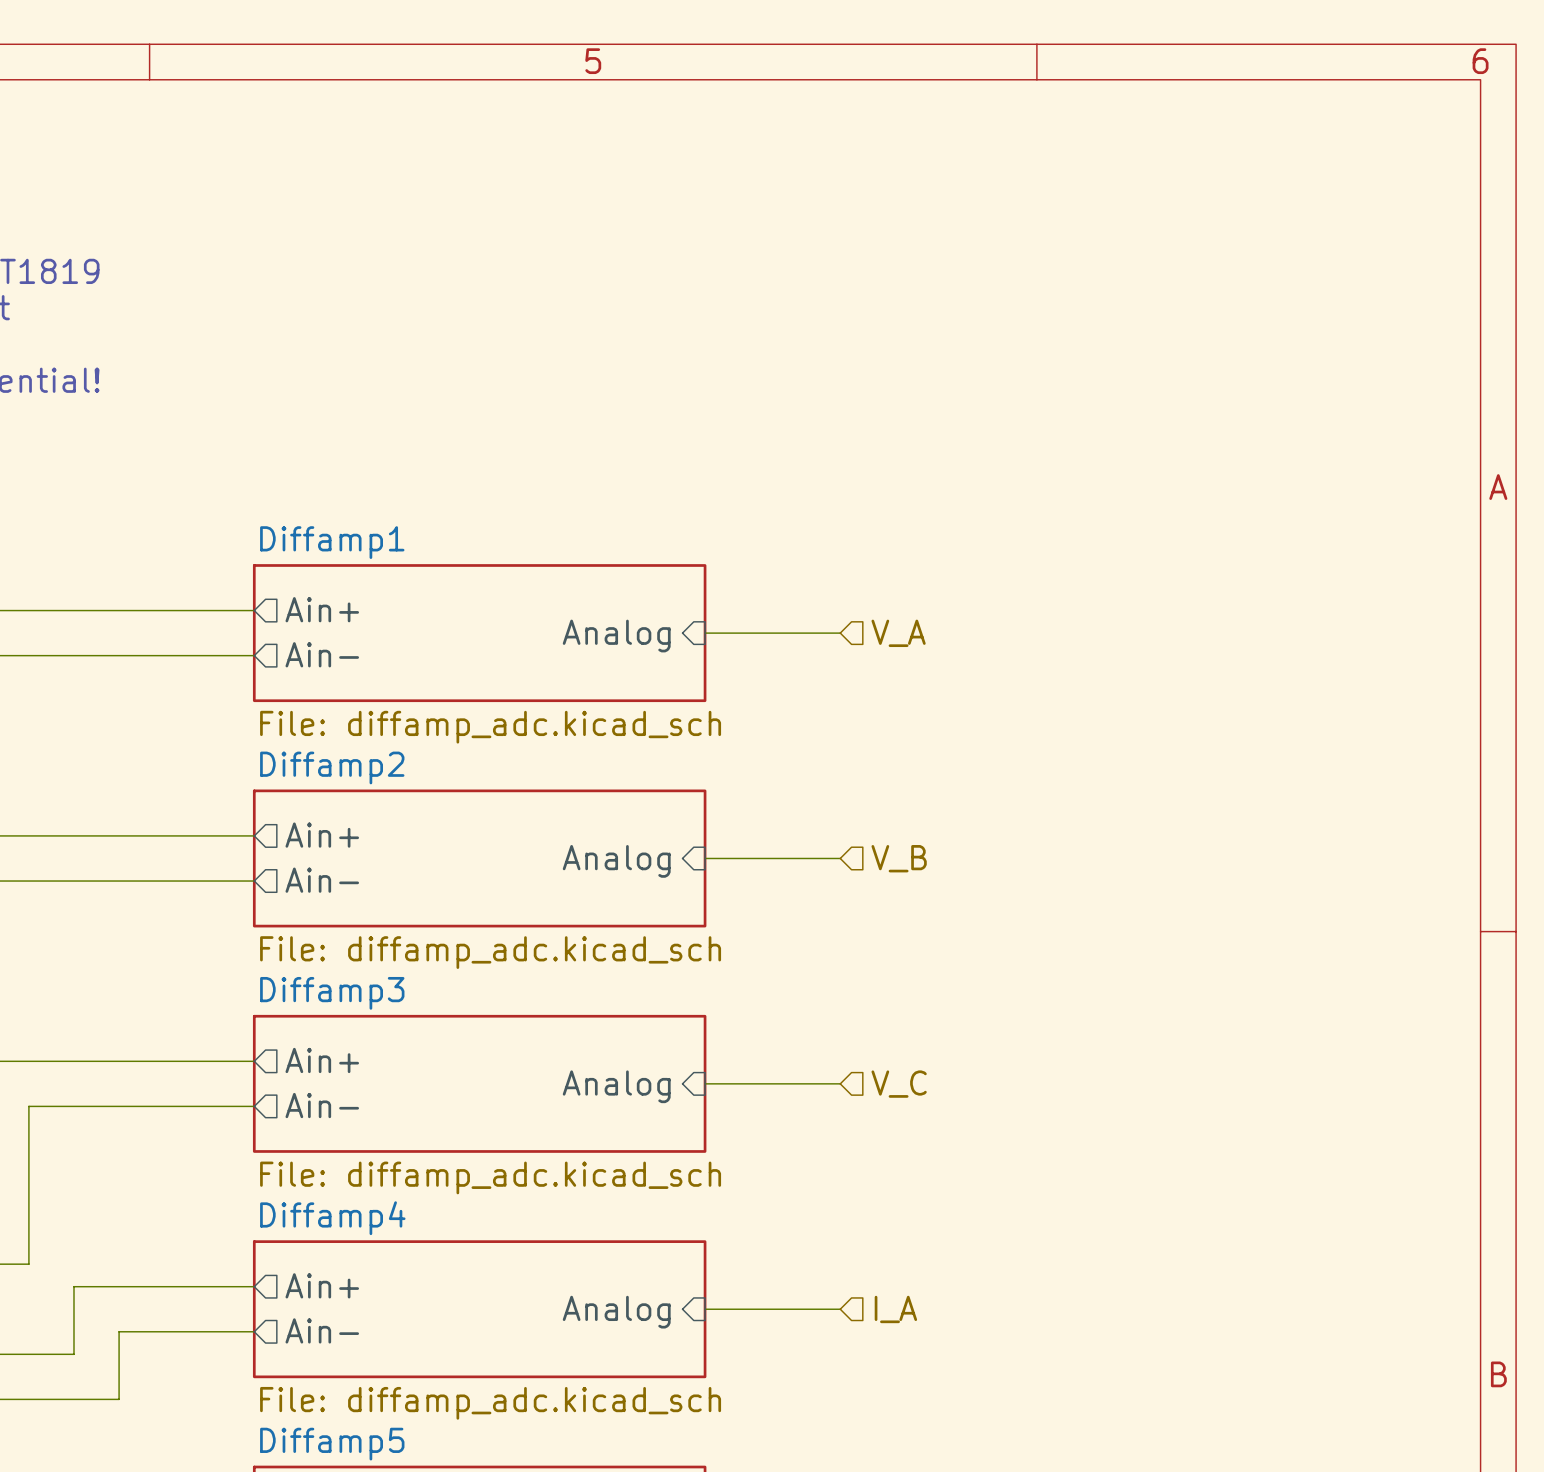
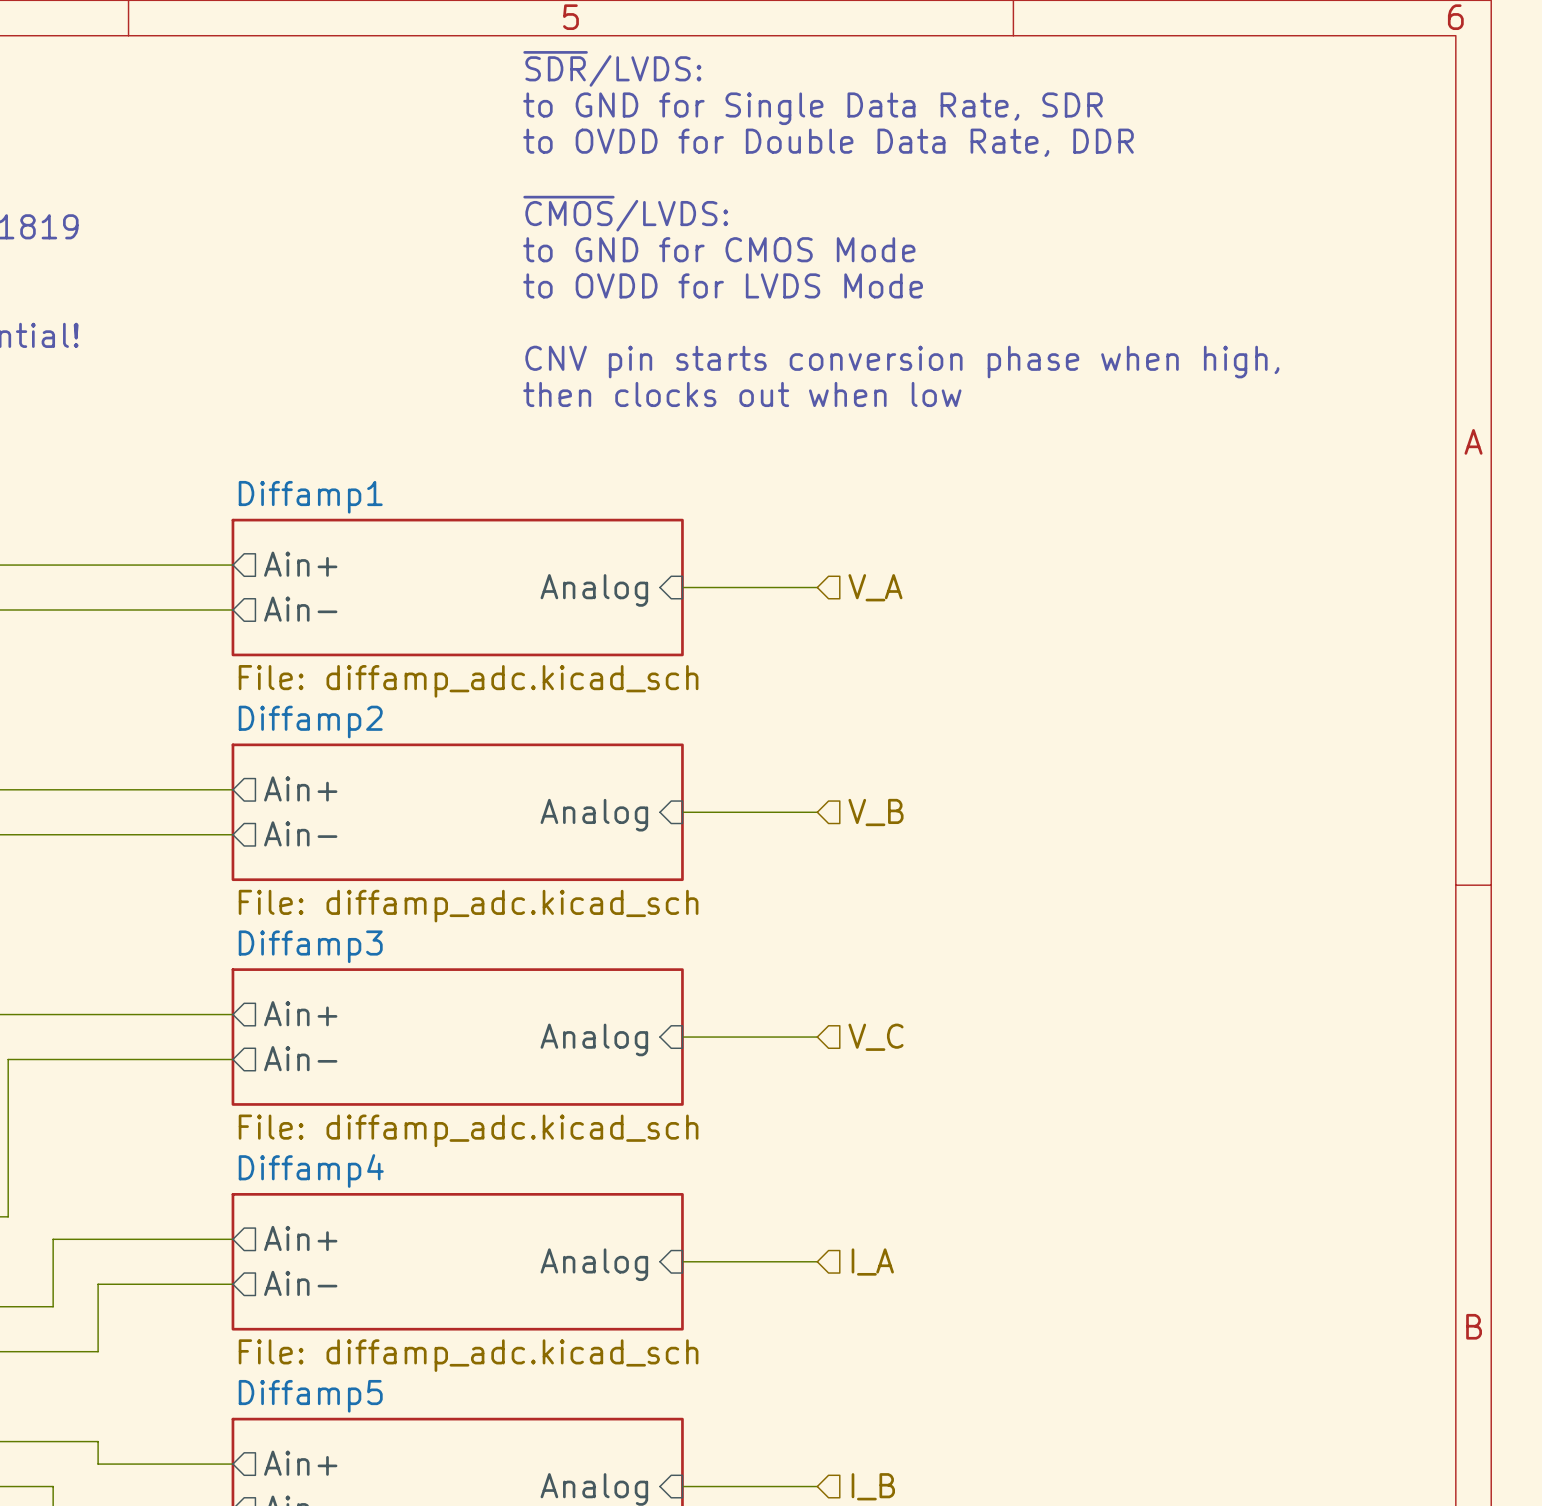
text: none -> ~{SDR}/LVDS: (612, 68)
text: none -> to GND for Single Data Rate, SDR (812, 108)
text: none -> to OVDD for Double Data Rate, DDR (828, 142)
text: none -> ~{CMOS}/LVDS: (625, 213)
text: none -> to GND for CMOS Mode (719, 249)
text: none -> to OVDD for LVDS Mode (723, 285)
text: none -> CNV pin starts conversion phase when high, (902, 362)
text: none -> then clocks out when low (742, 394)

